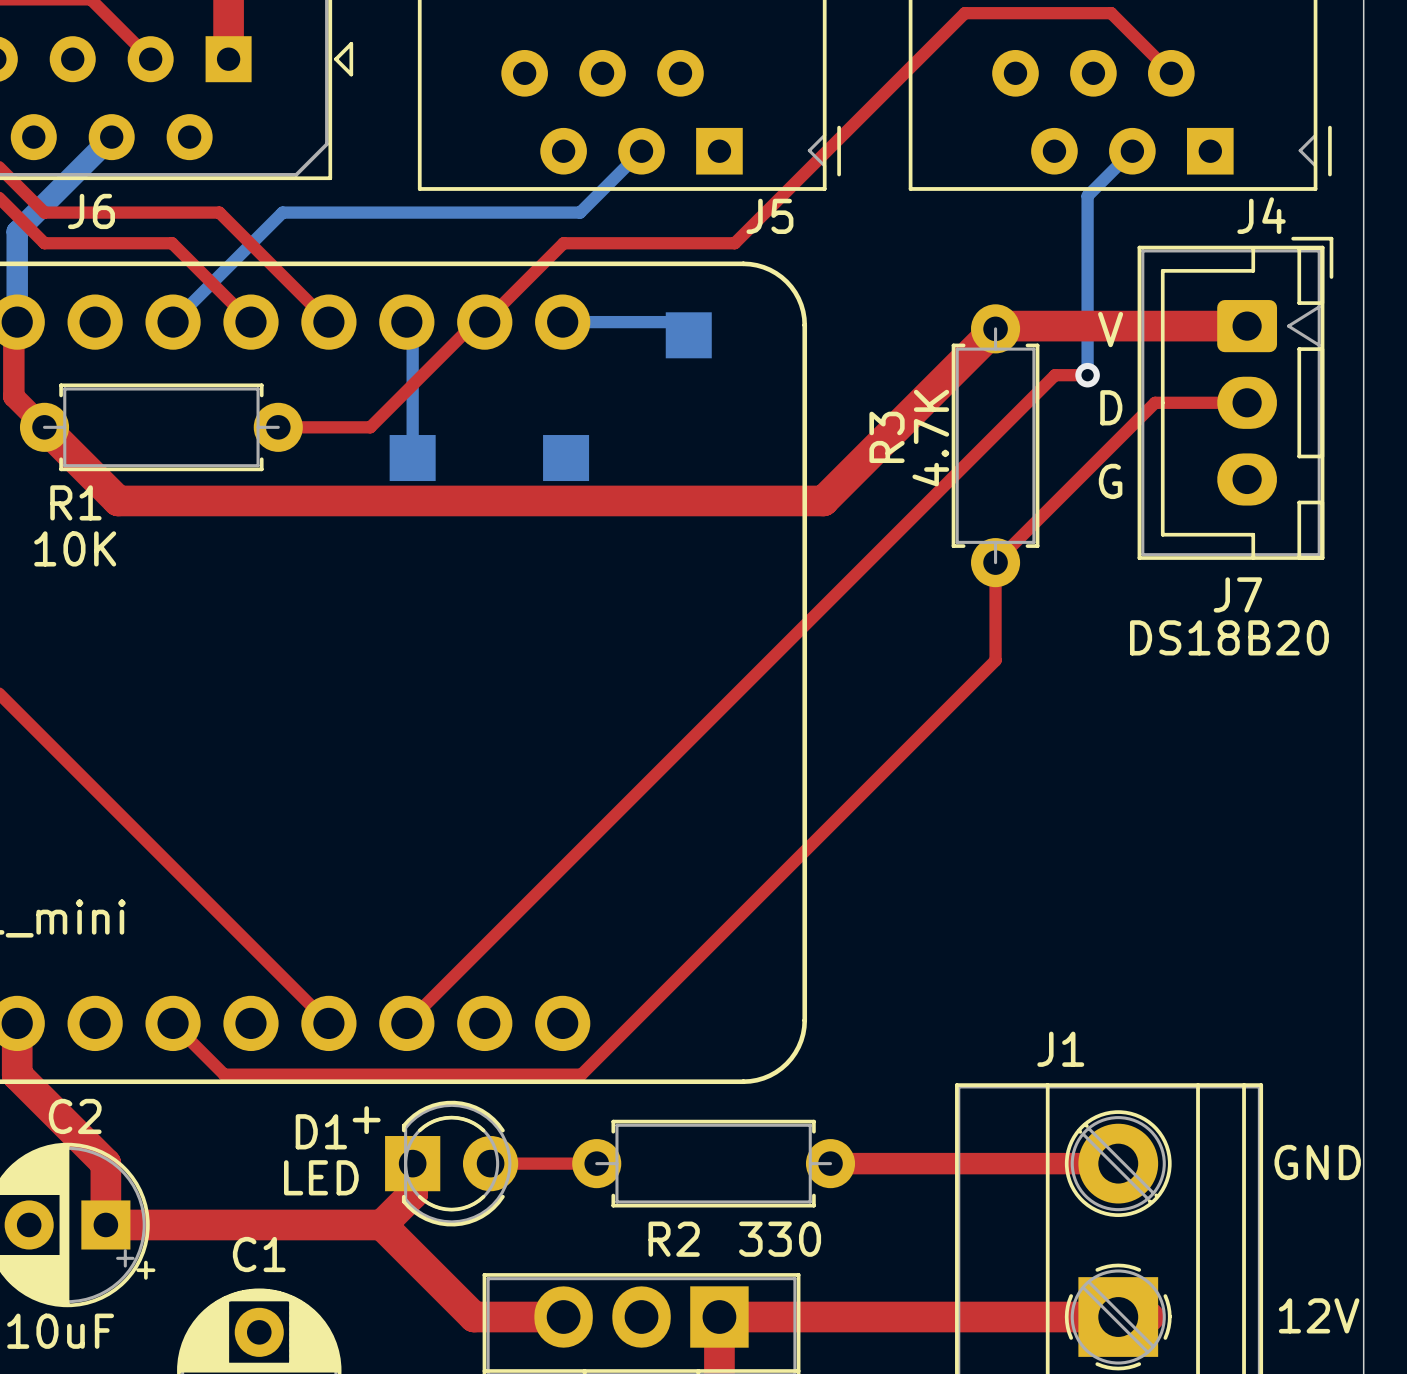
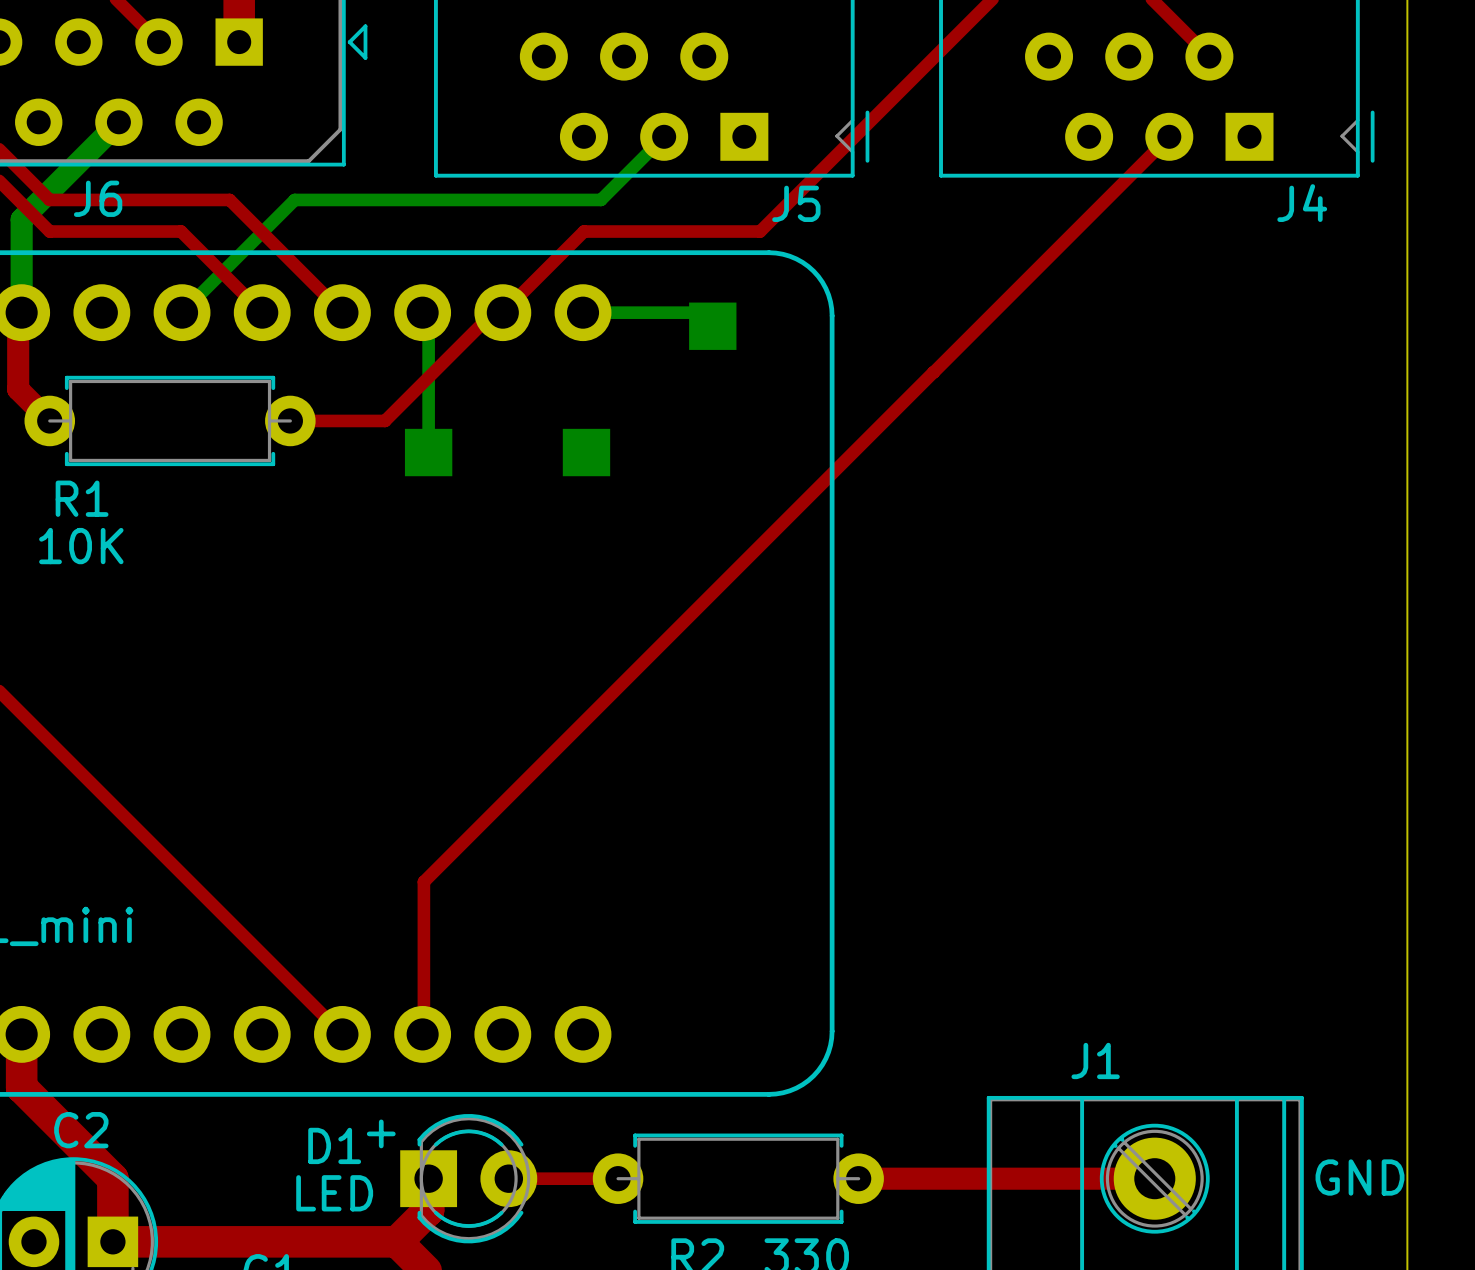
top track: none -> (1169, 136) (933, 372)
bottom track: (1132, 151) (1087, 196) (1087, 375) -> none
top track: (1247, 326) (998, 326) (823, 500) (118, 500) (44, 427) -> none
text: V (1110, 329) -> none
top track: (1087, 375) (1055, 375) (408, 1022) -> (933, 372) (423, 881) (423, 1033)
via: (1087, 375) -> none
J7: DS18B20 (1235, 398) -> none
top track: (1247, 402) (1155, 402) (995, 562) (995, 660) (581, 1074) (224, 1074) (173, 1023) -> none
text: D (1111, 407) -> none
R3: 4.7K (995, 445) -> none
text: G (1110, 481) -> none

